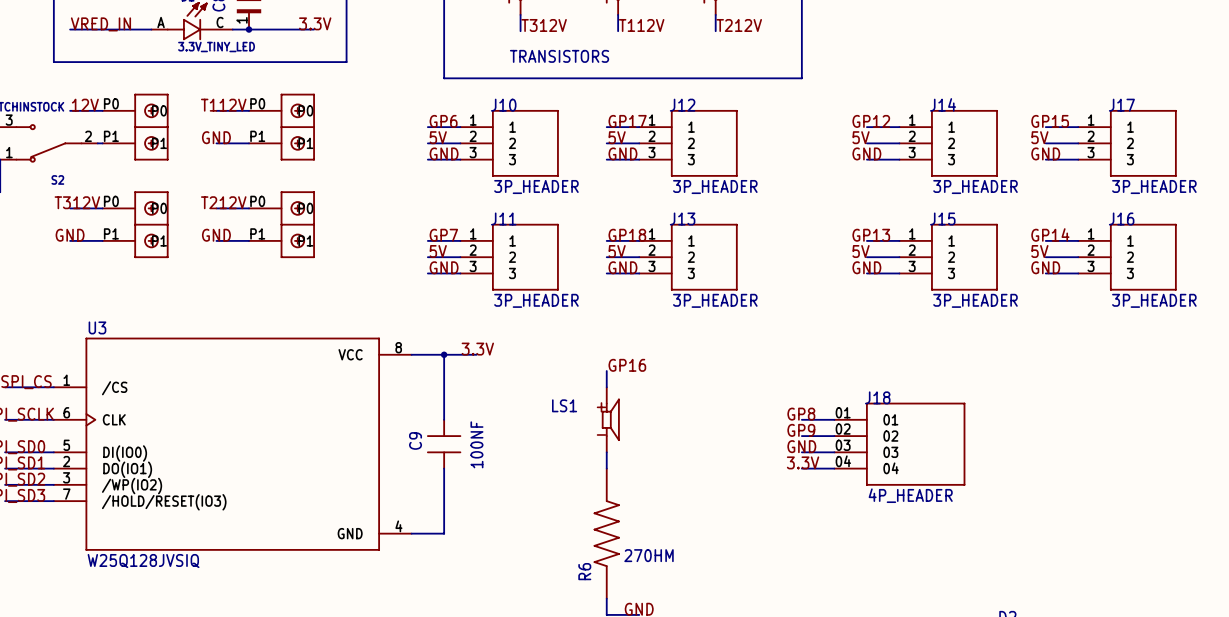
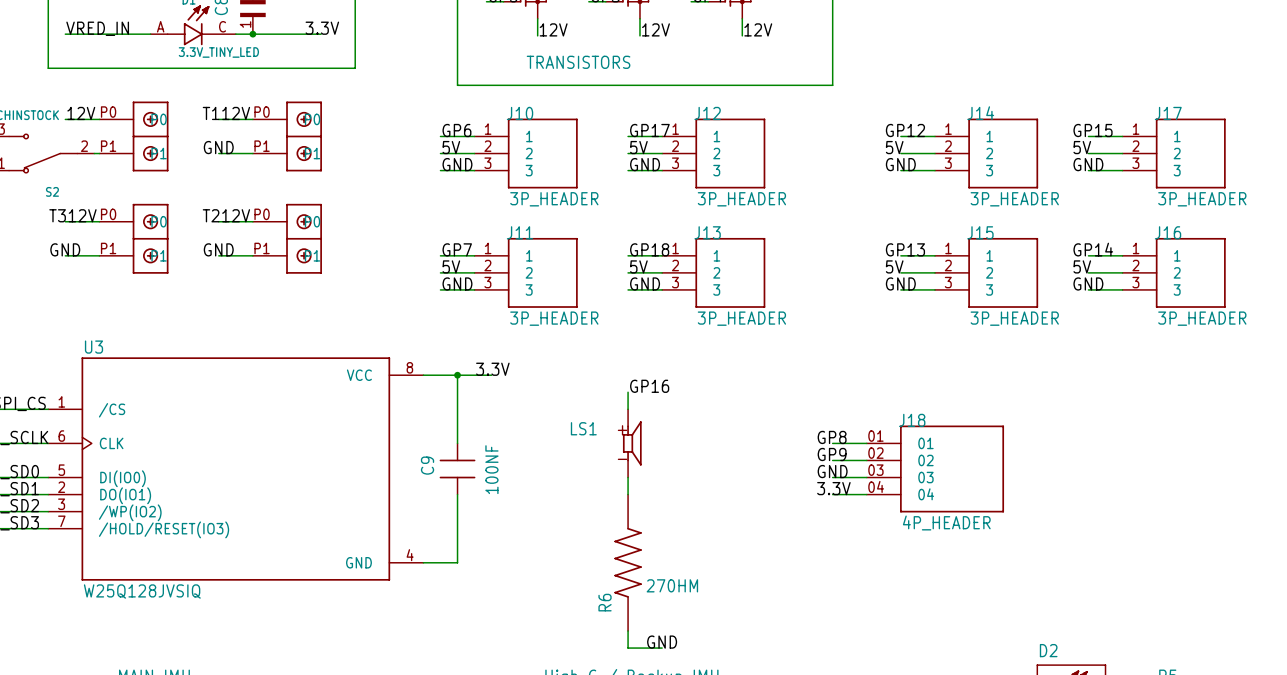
label: T312V (544, 25) -> 12V (553, 29)
label: T112V (641, 25) -> 12V (655, 29)
label: T212V (739, 25) -> 12V (758, 29)

